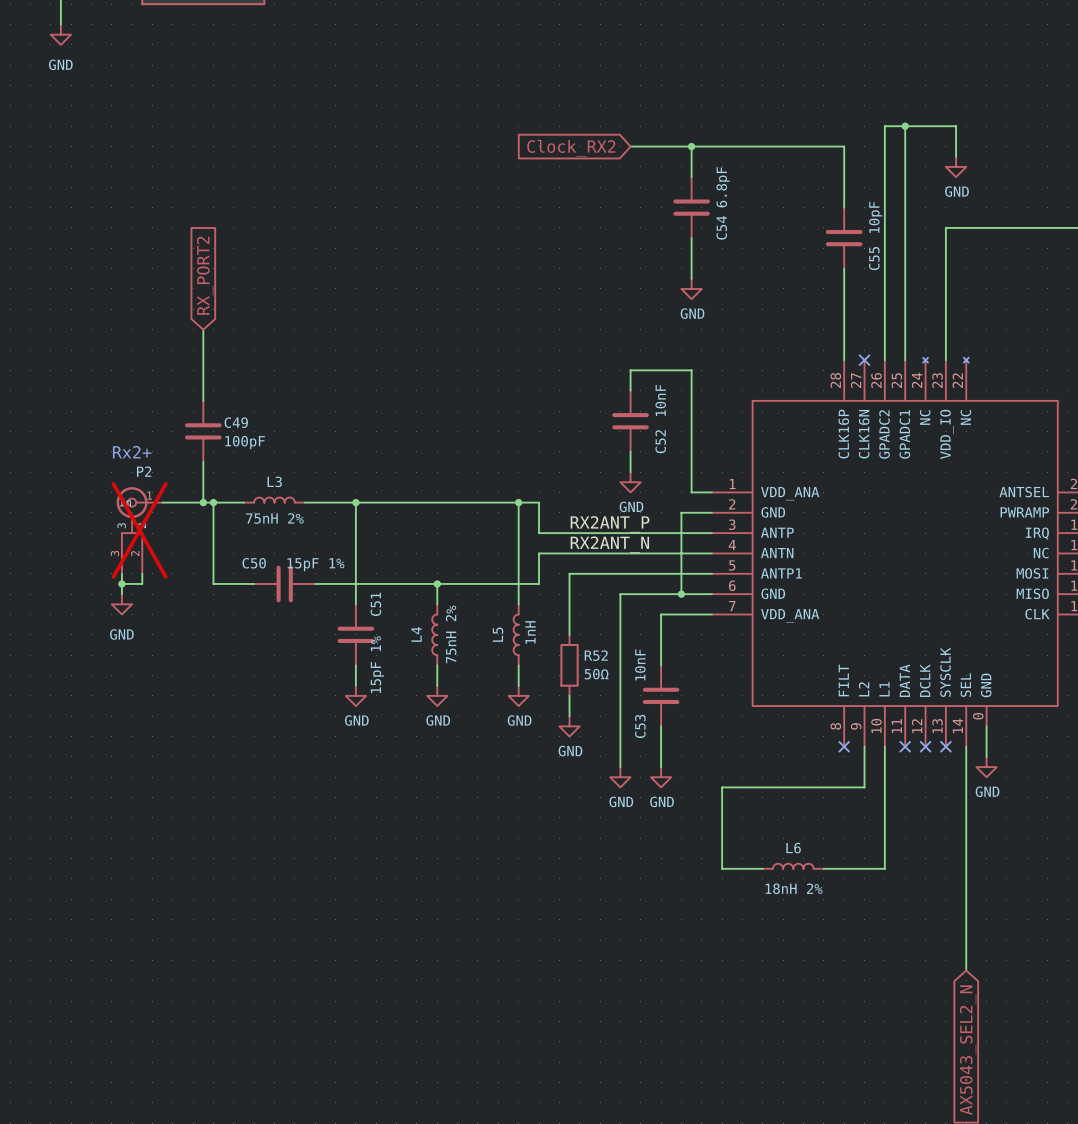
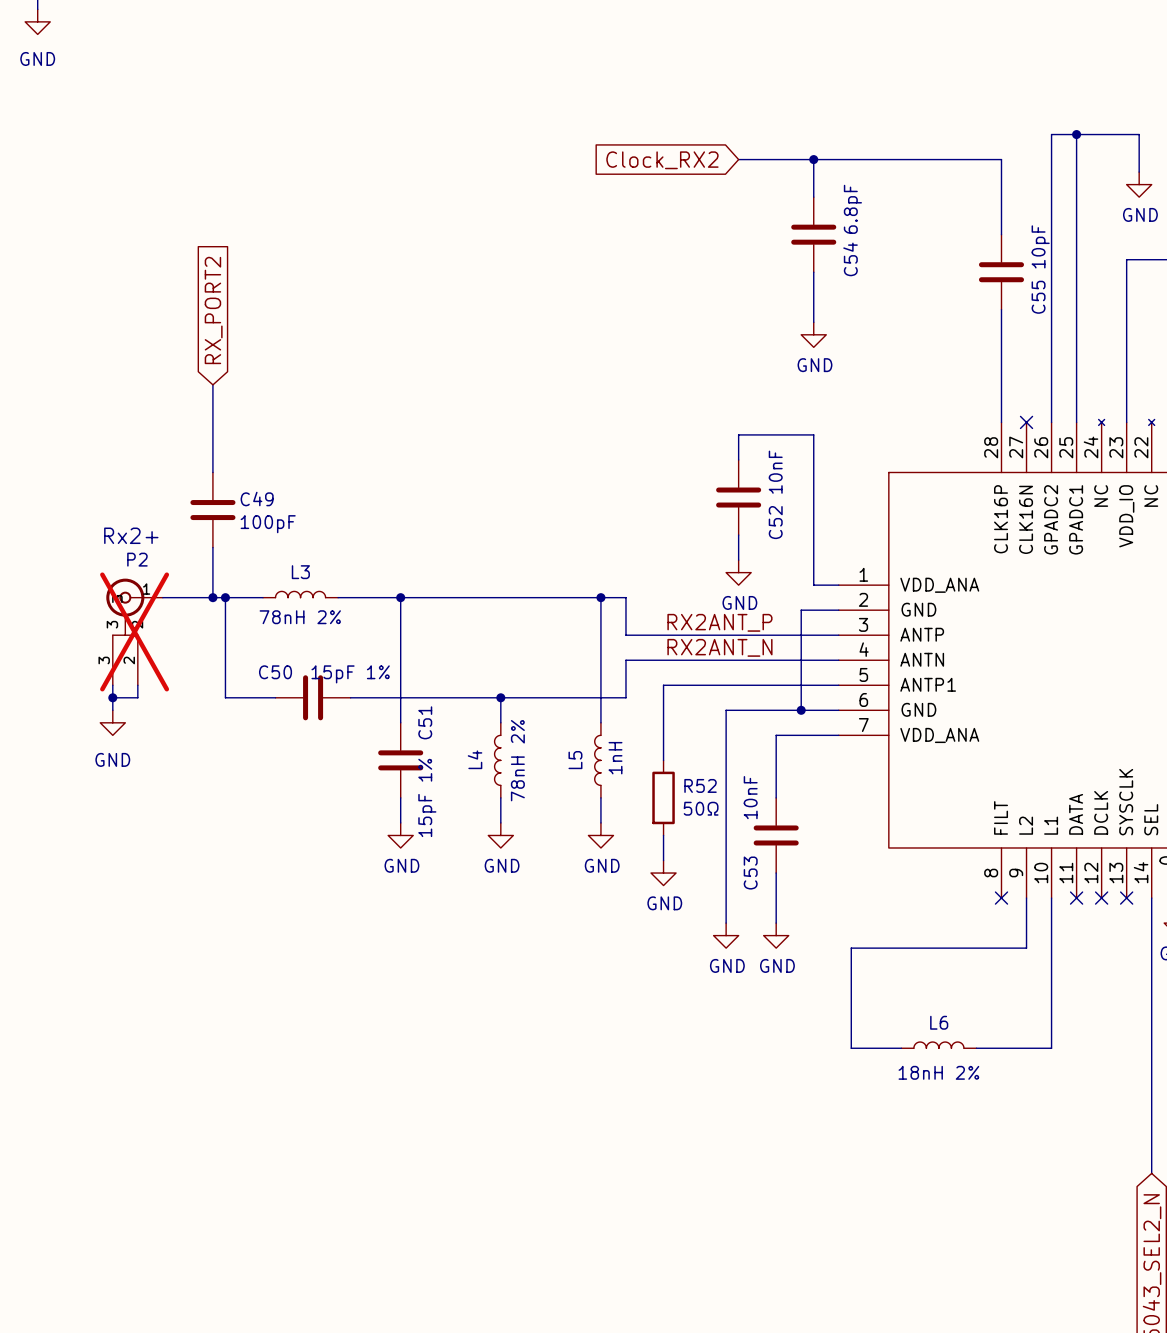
L3 value: 75nH 2% (274, 518) -> 78nH 2% (300, 617)
L4 value: 75nH 2% (451, 634) -> 78nH 2% (517, 760)

